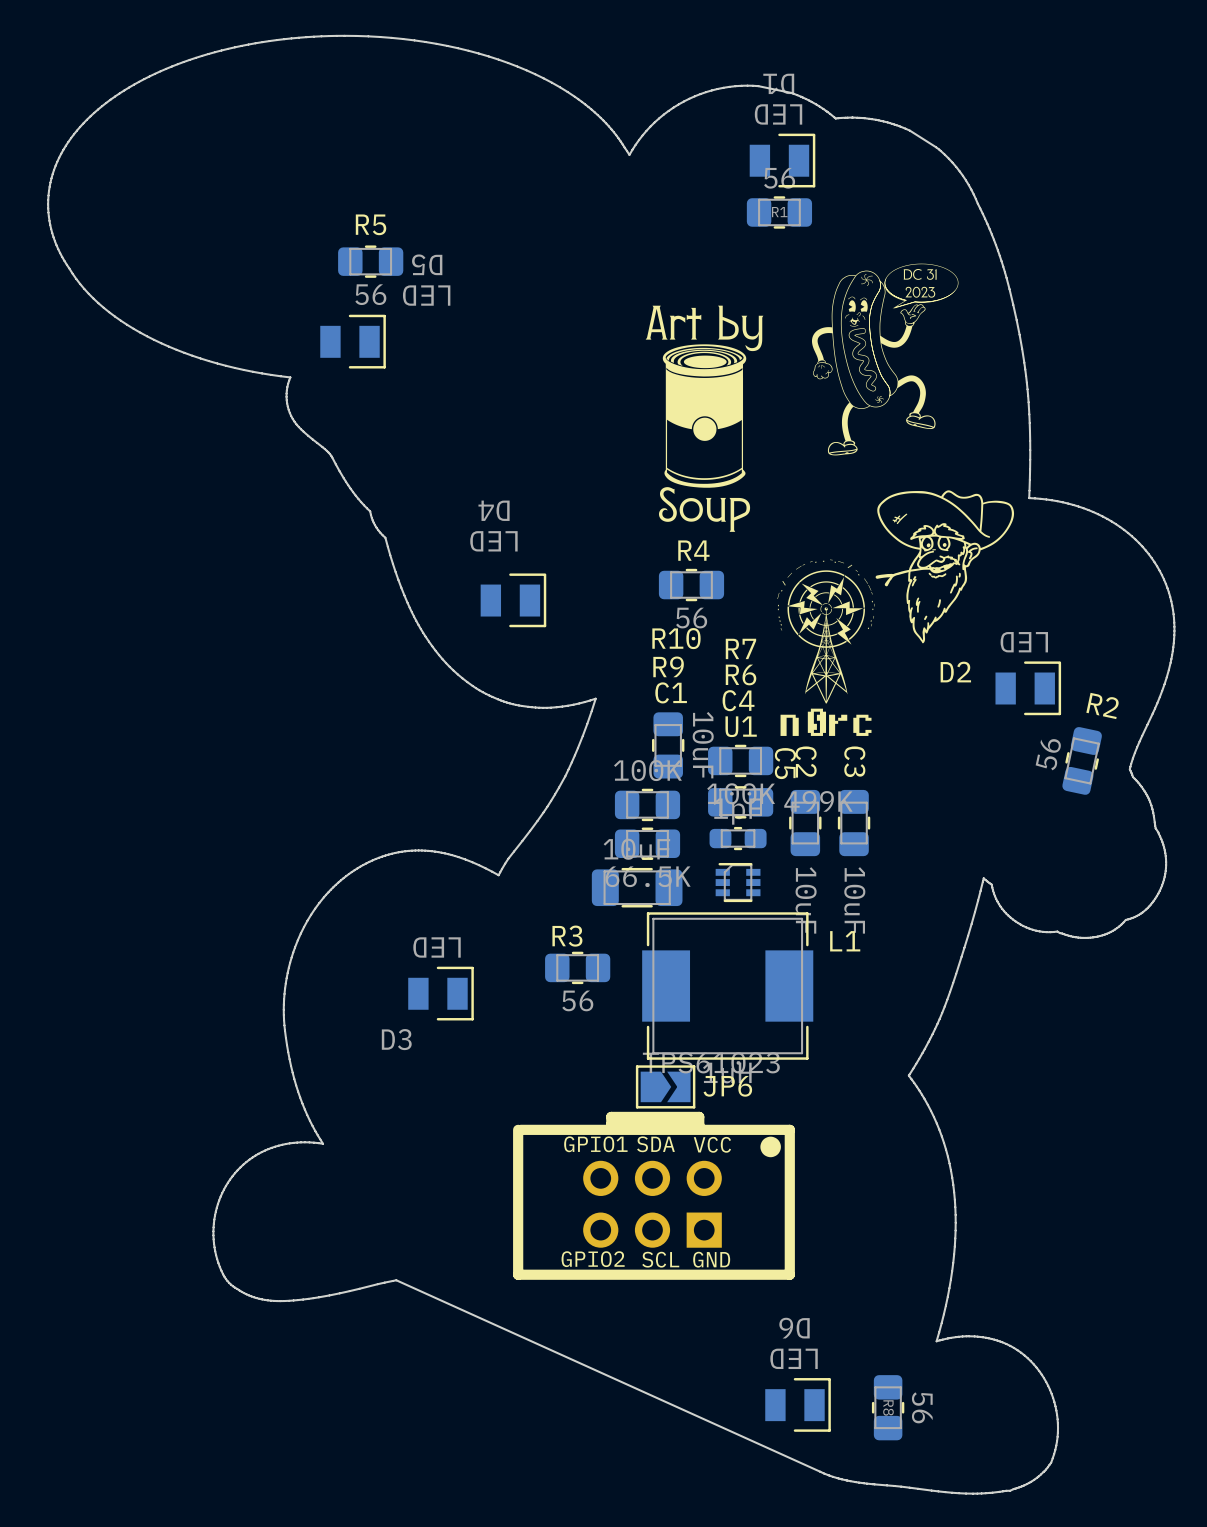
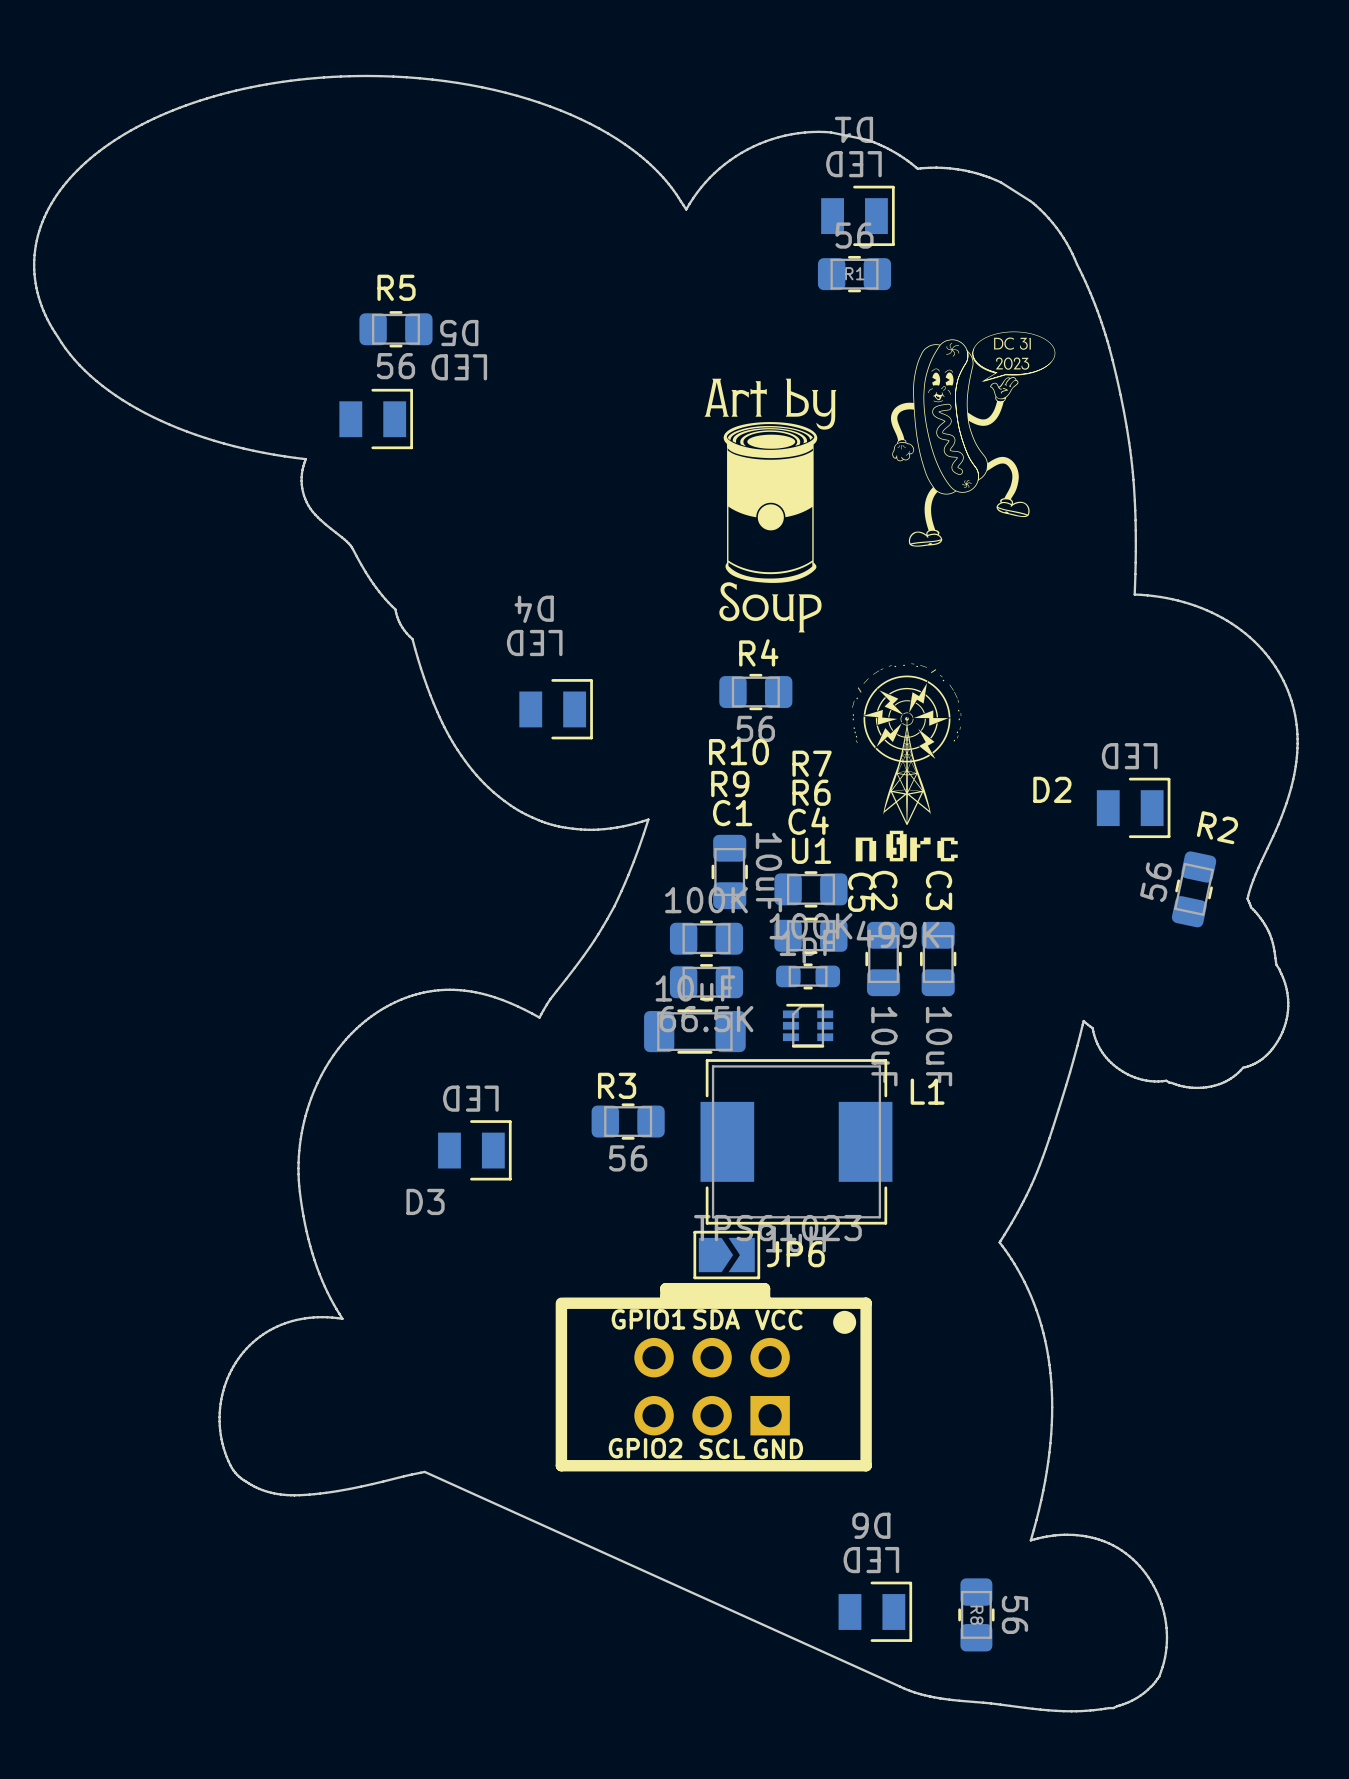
drawing: [875, 490, 1015, 644] -> none

